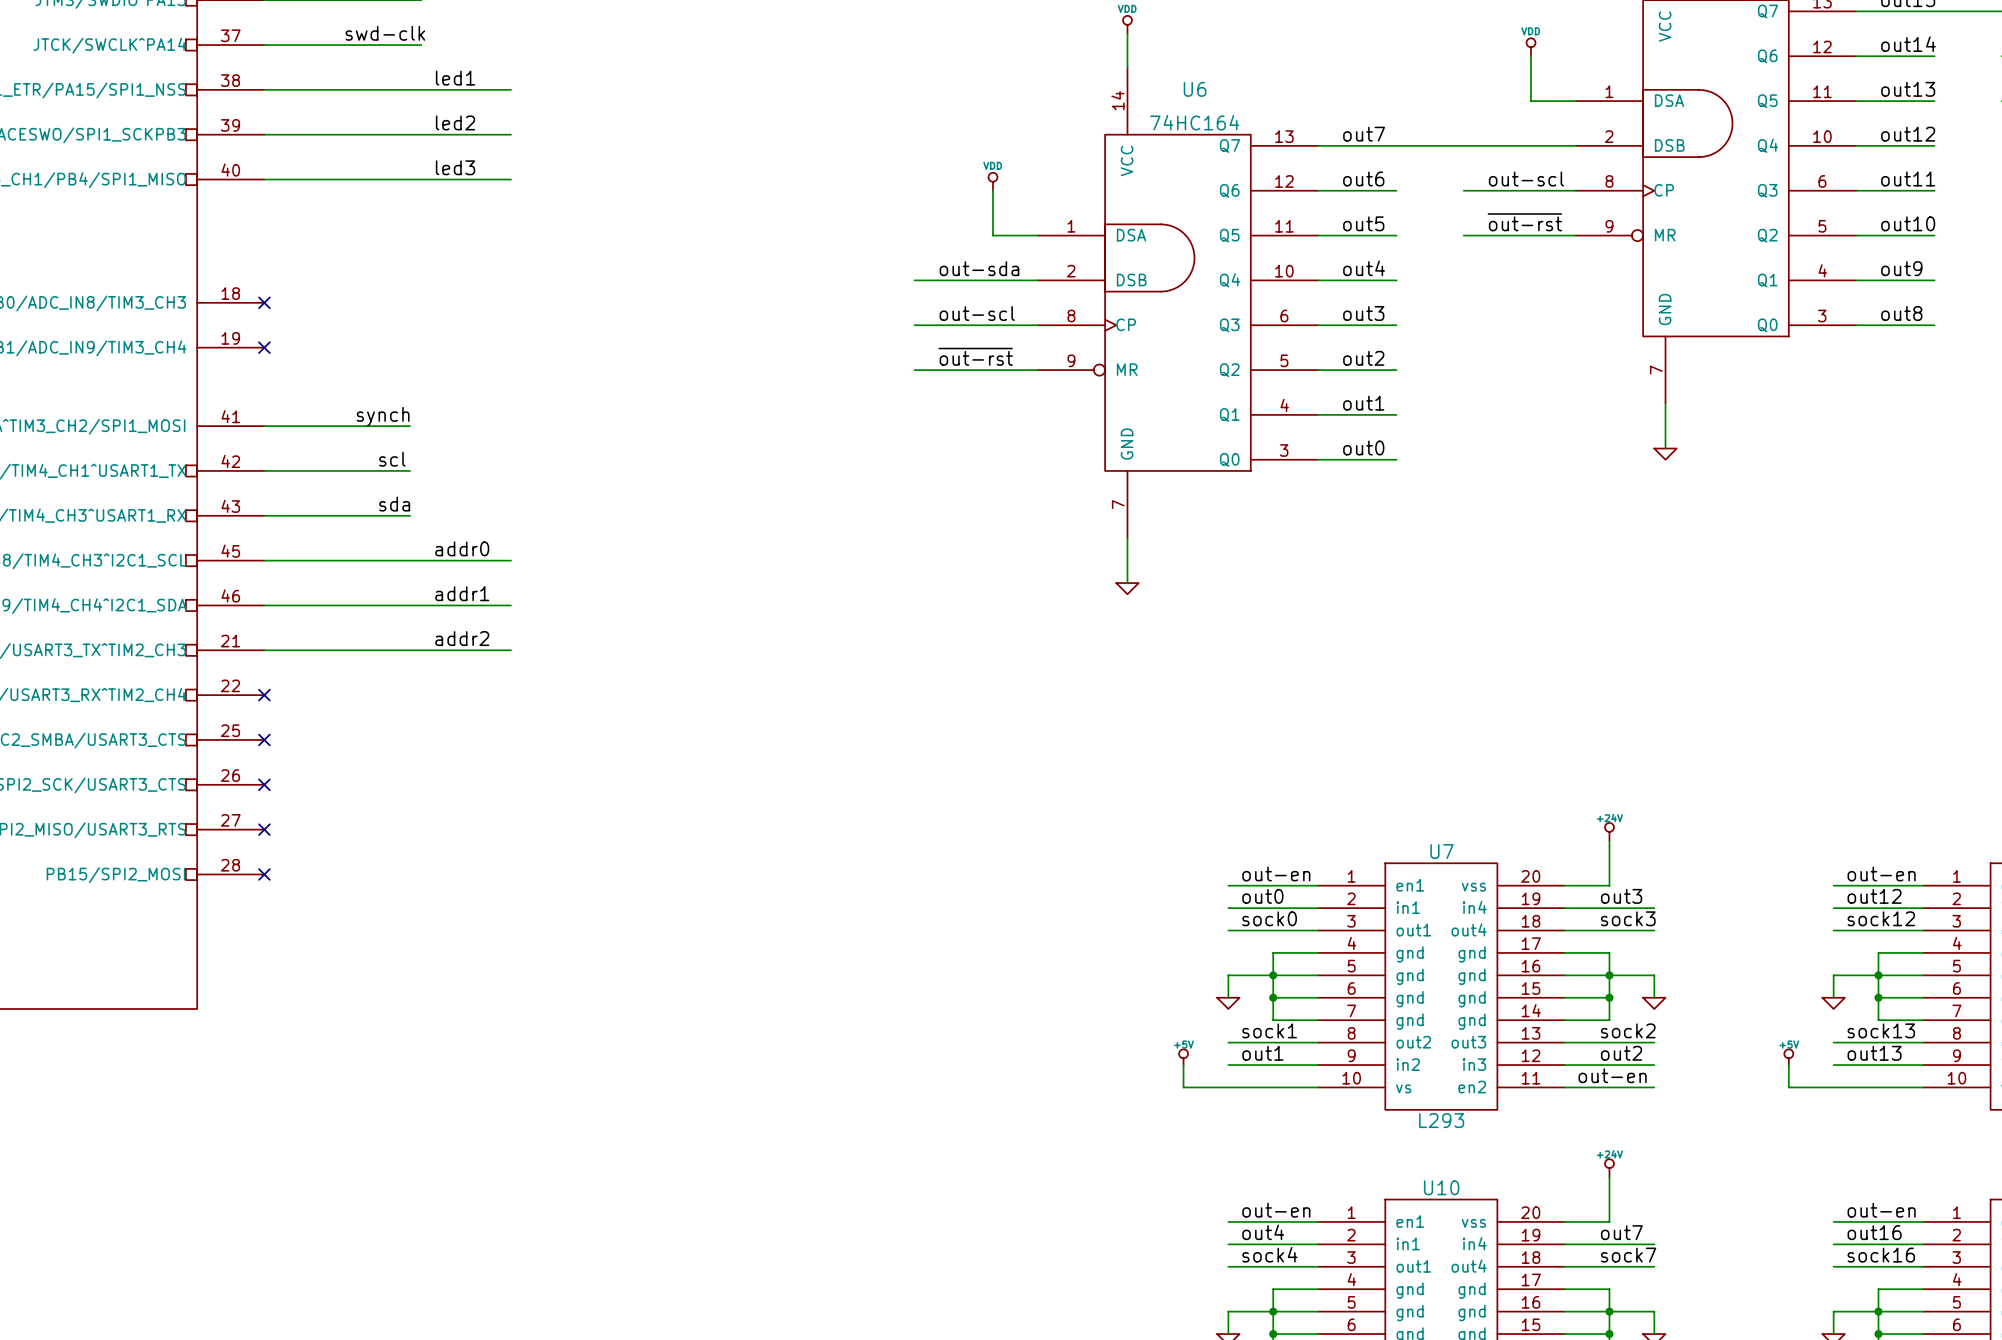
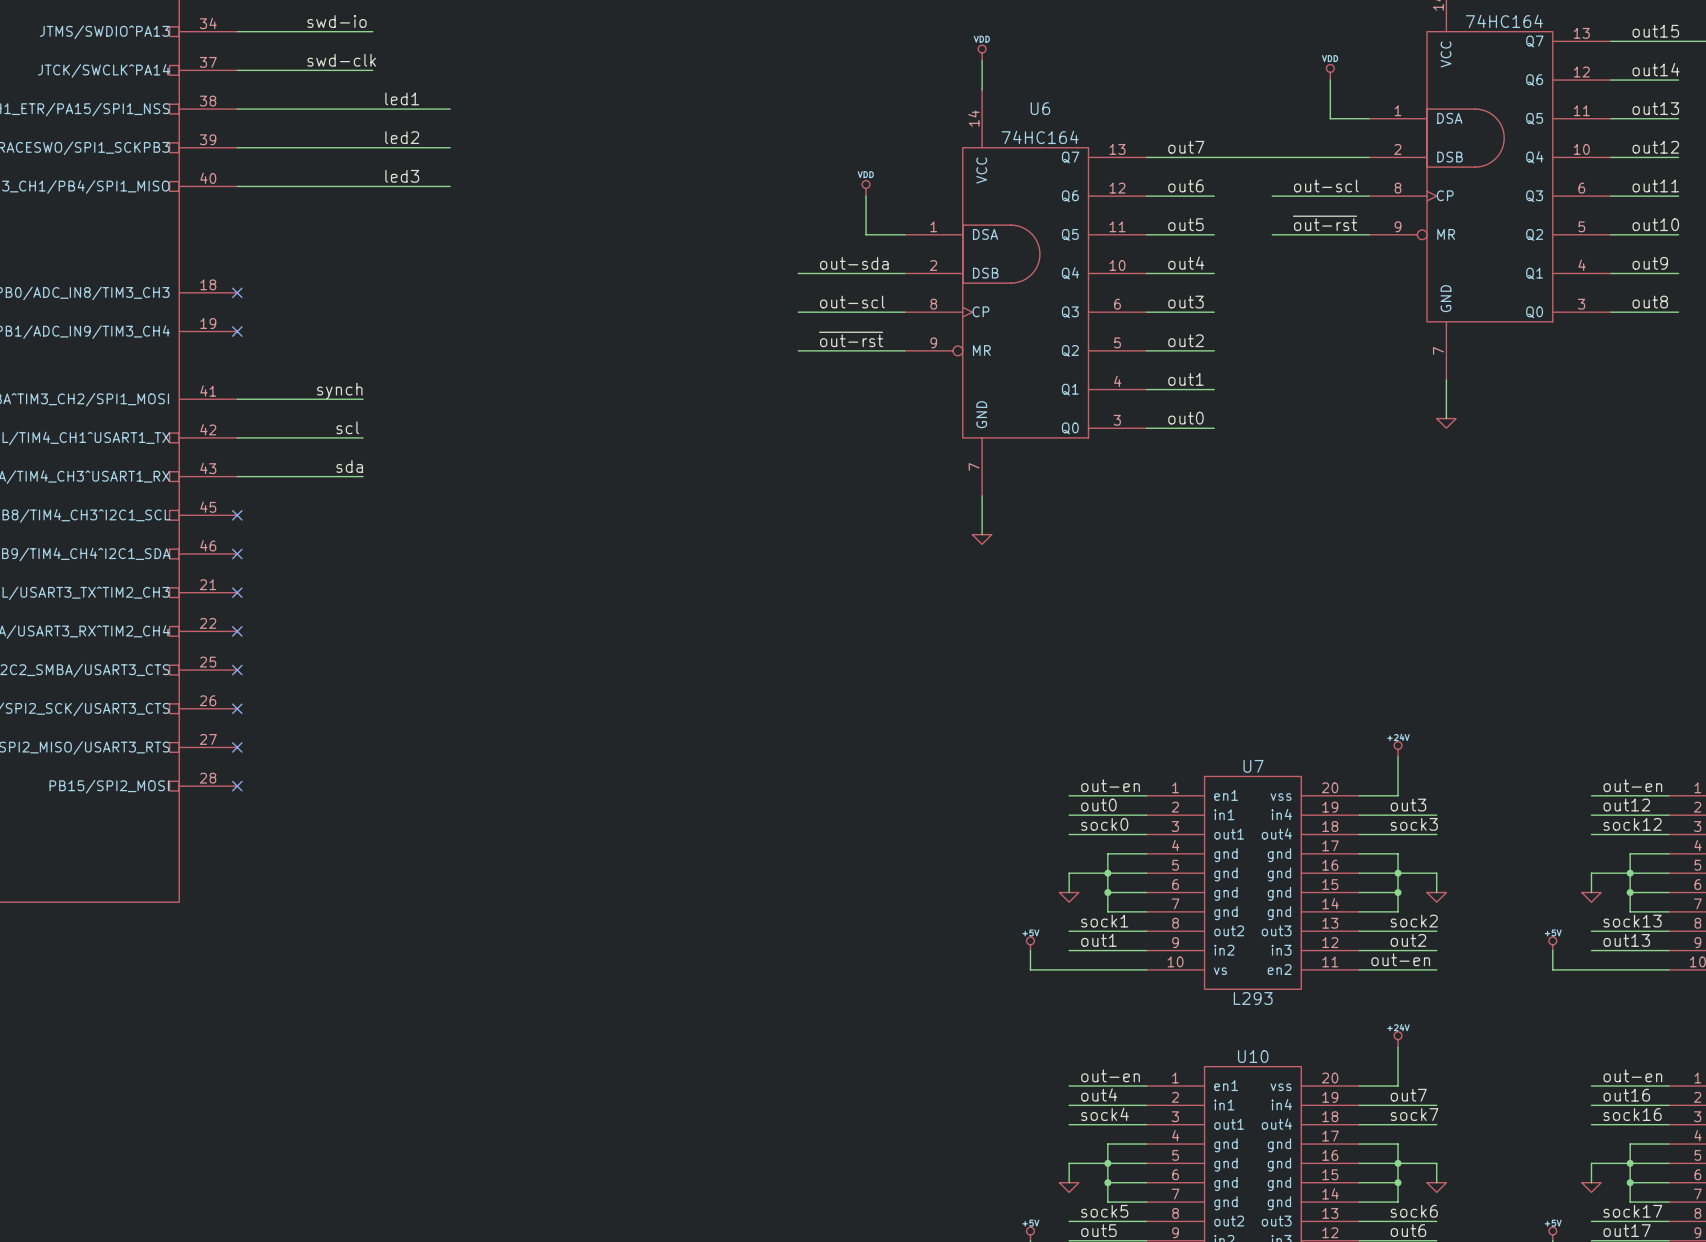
label: addr0 (462, 548) -> none
wire: (264, 560) (511, 560) -> none
no-connect mark: none -> (237, 515)
label: addr1 (462, 593) -> none
wire: (264, 605) (511, 605) -> none
no-connect mark: none -> (237, 553)
label: addr2 (462, 638) -> none
wire: (264, 650) (511, 650) -> none
no-connect mark: none -> (237, 592)

